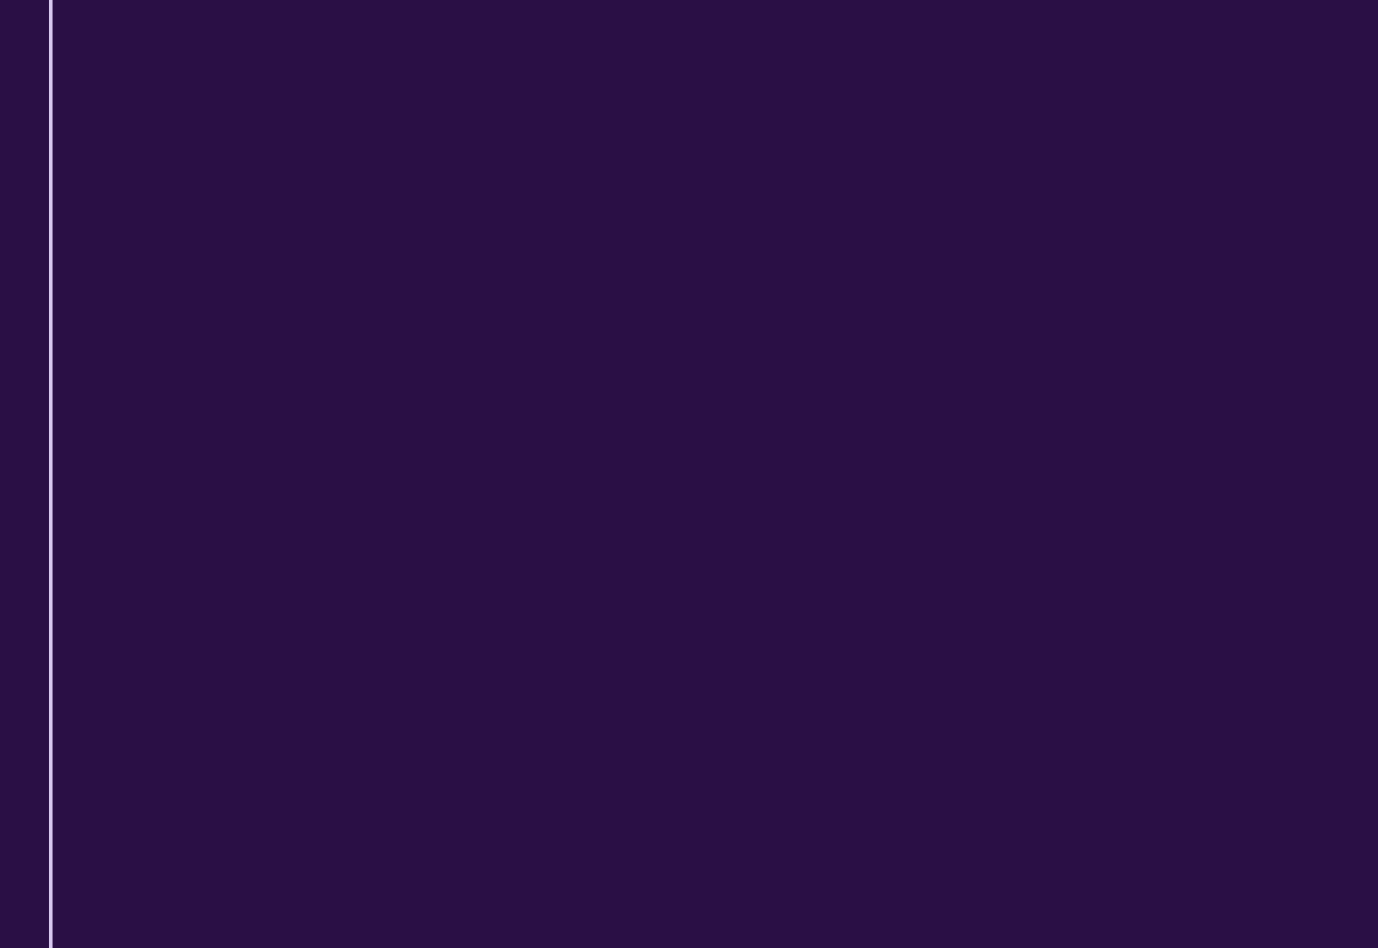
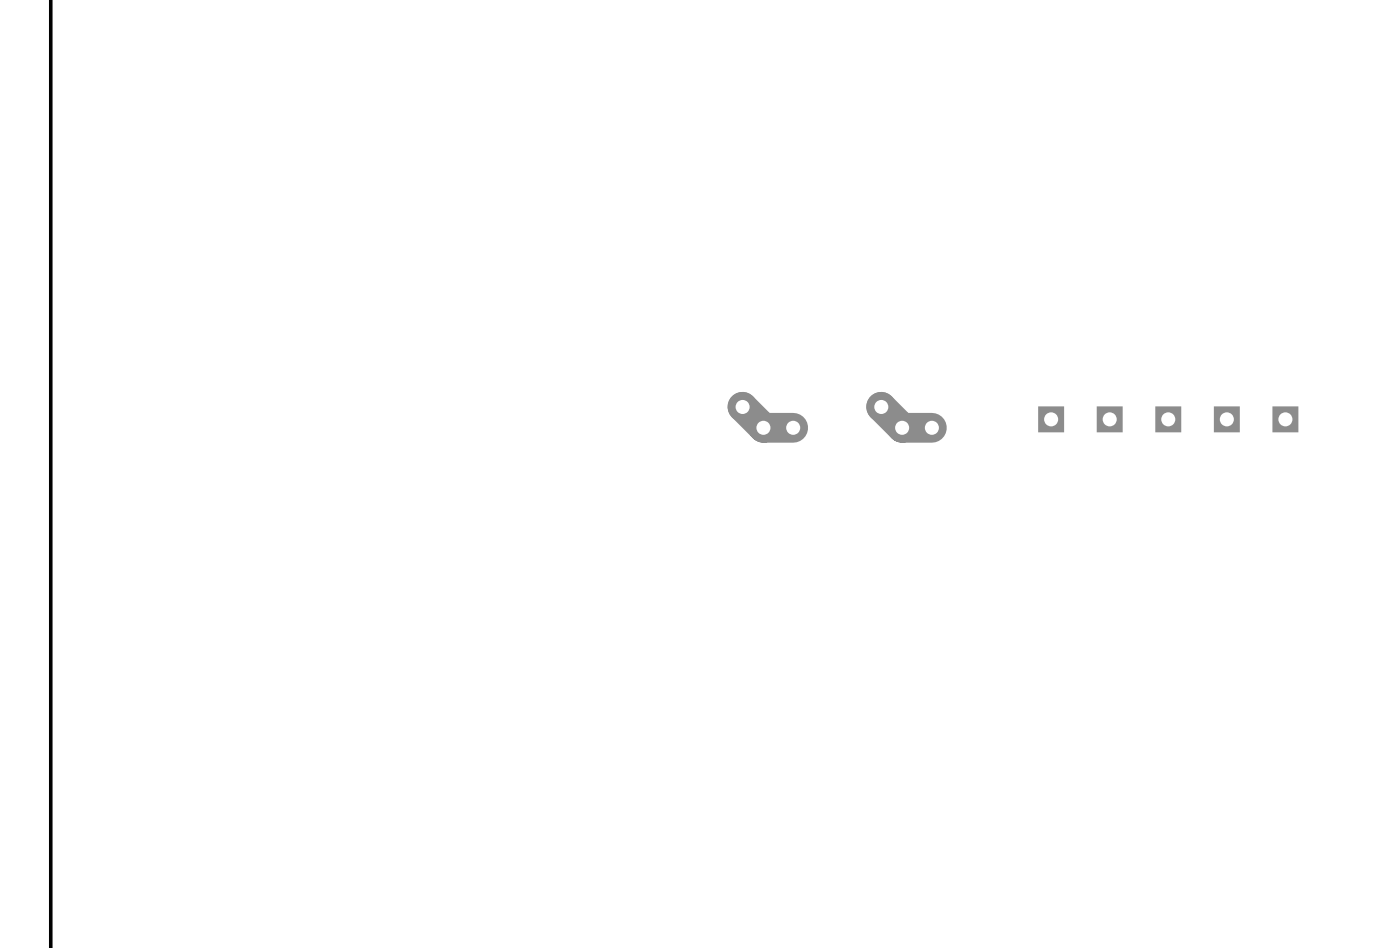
part: none -> (767, 417)
part: none -> (906, 417)
part: none -> (1168, 419)

